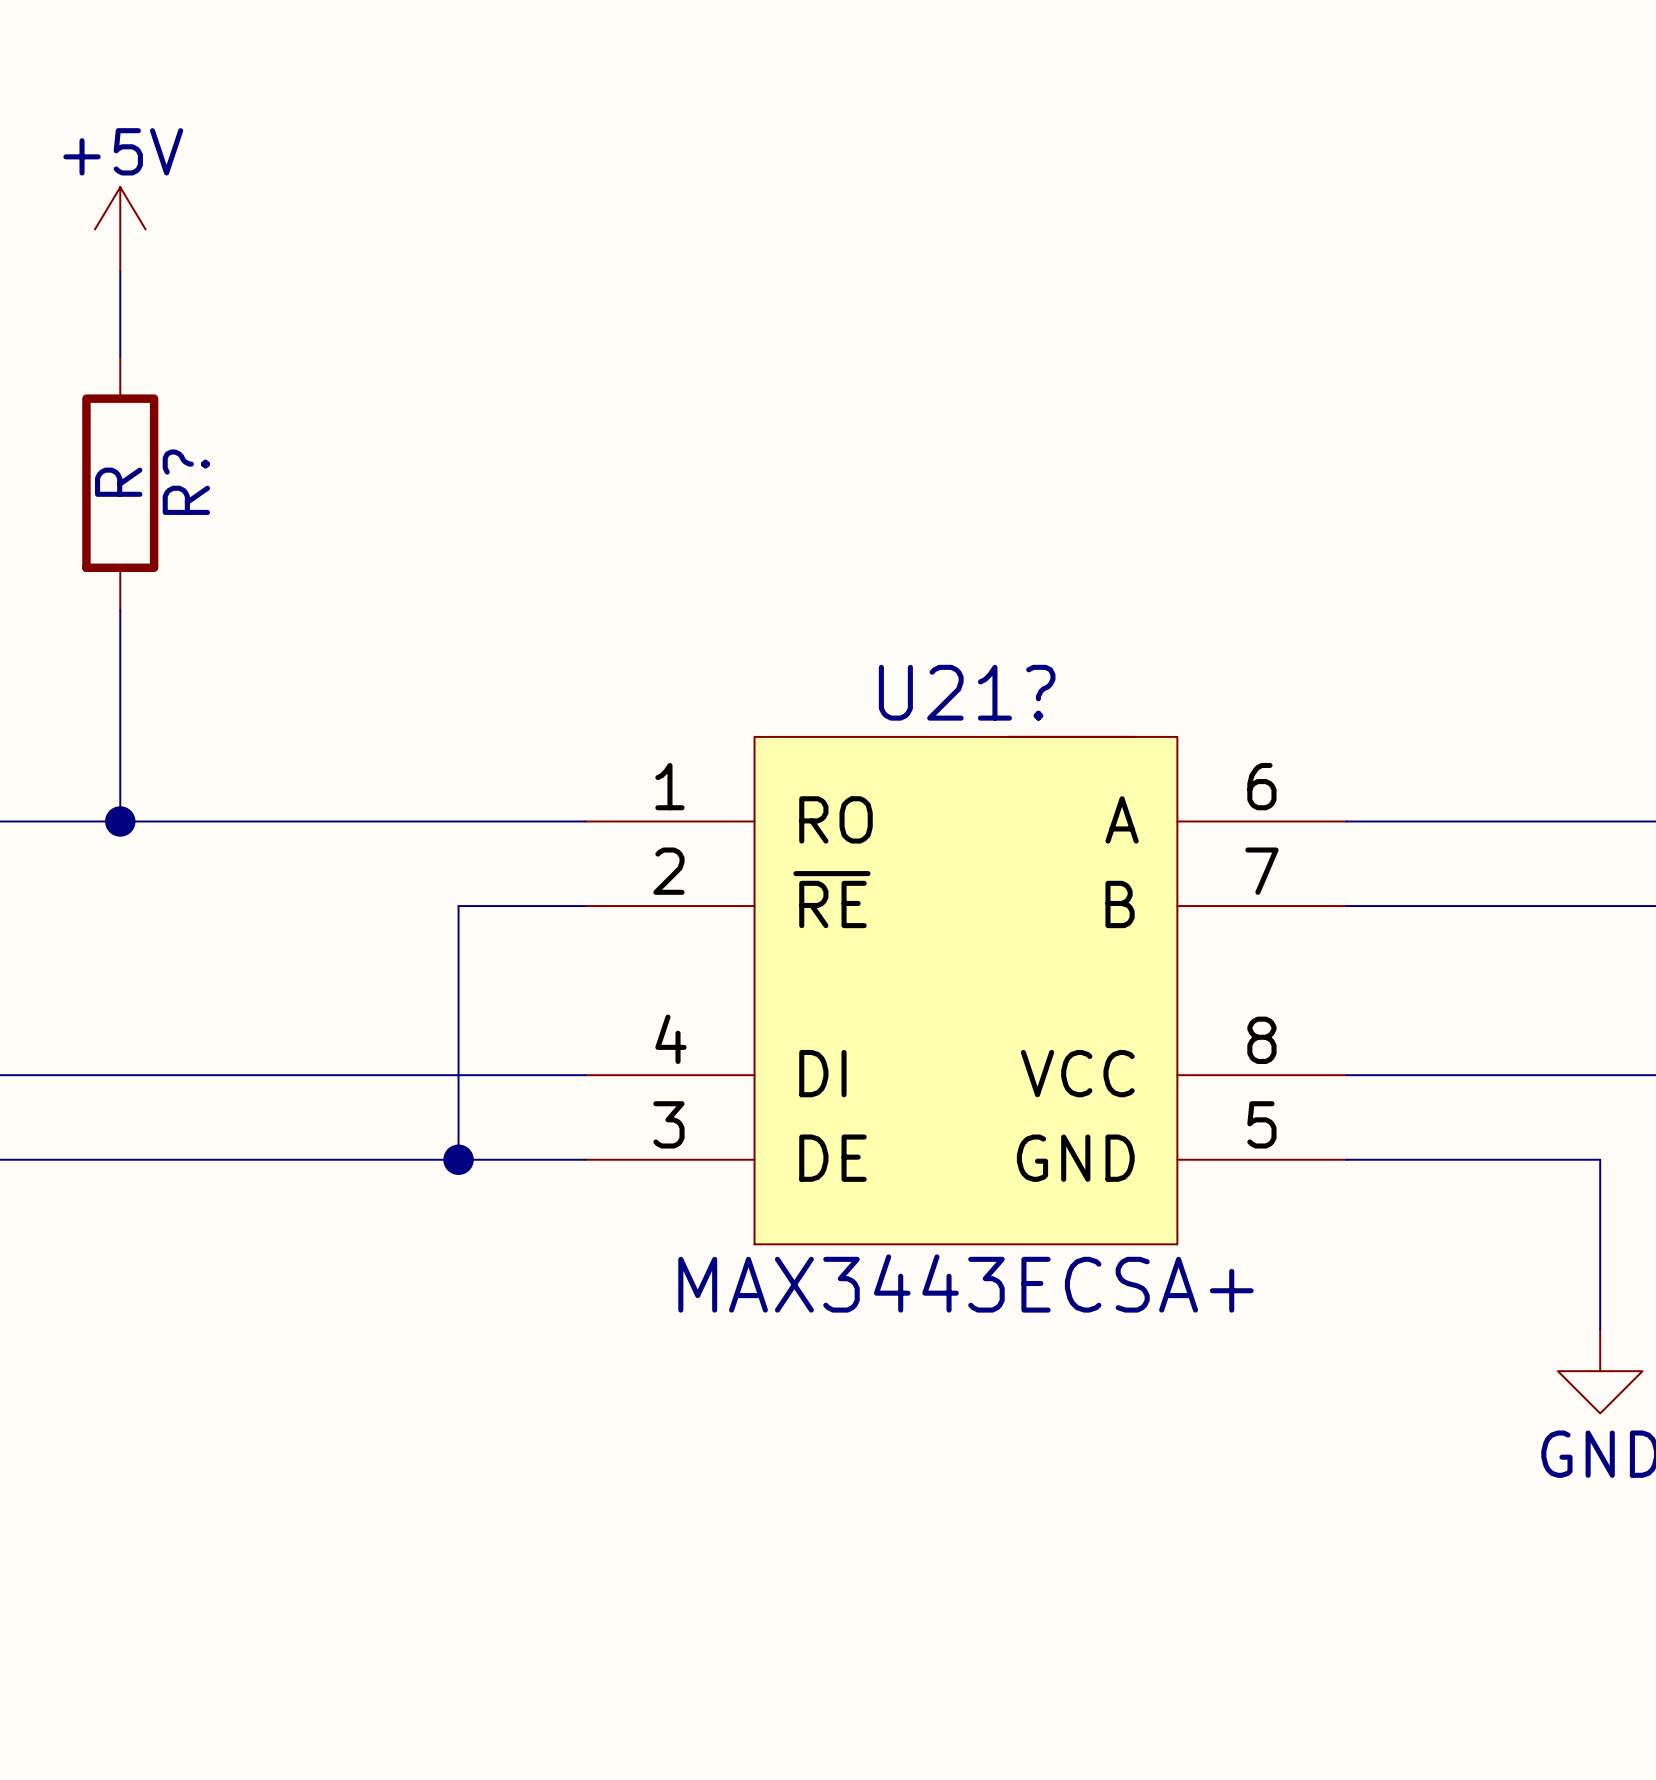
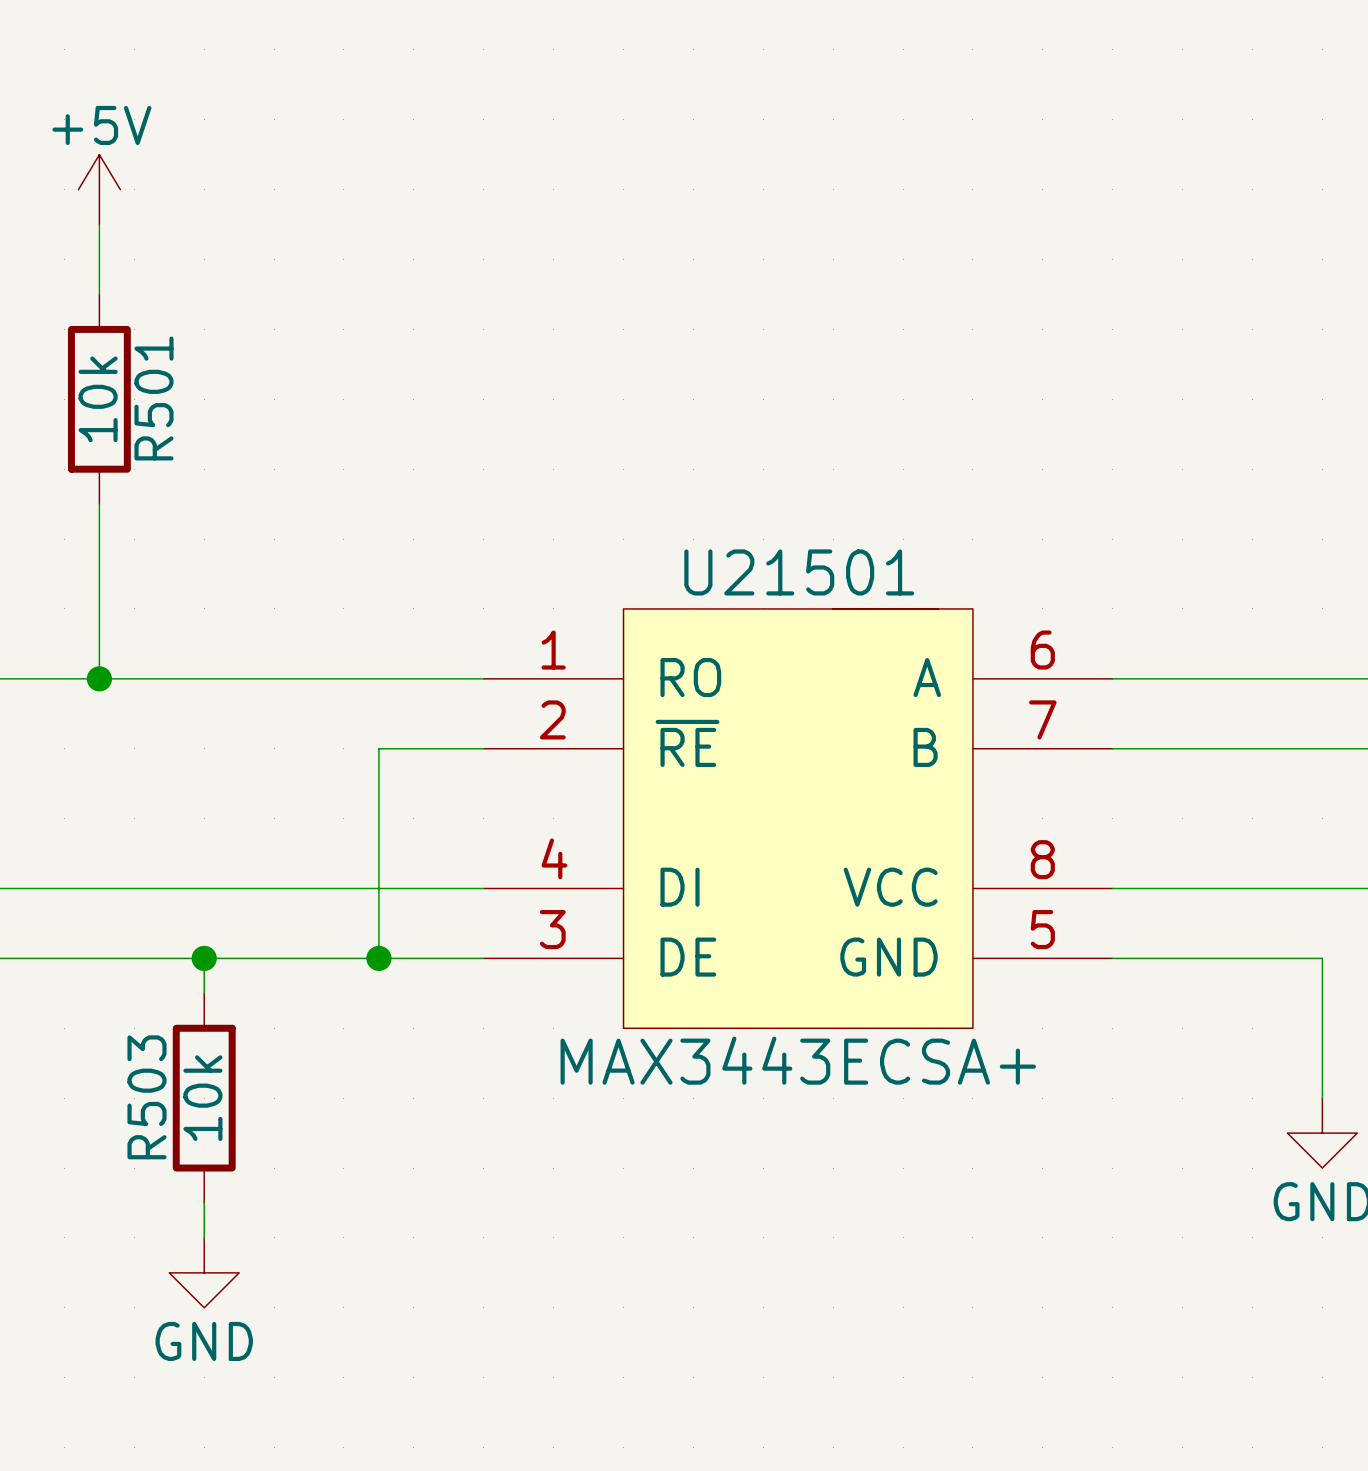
R? value: R (118, 482) -> 10k (98, 399)
R? name: R? (186, 482) -> R501 (153, 398)
U21? name: U21? (967, 692) -> U21501 (799, 572)
wire: none -> (204, 958) (204, 993)
junction: none -> (204, 958)
R503: none -> 10k (204, 1098)
wire: none -> (204, 1202) (204, 1237)
power symbol: none -> GND (204, 1272)

